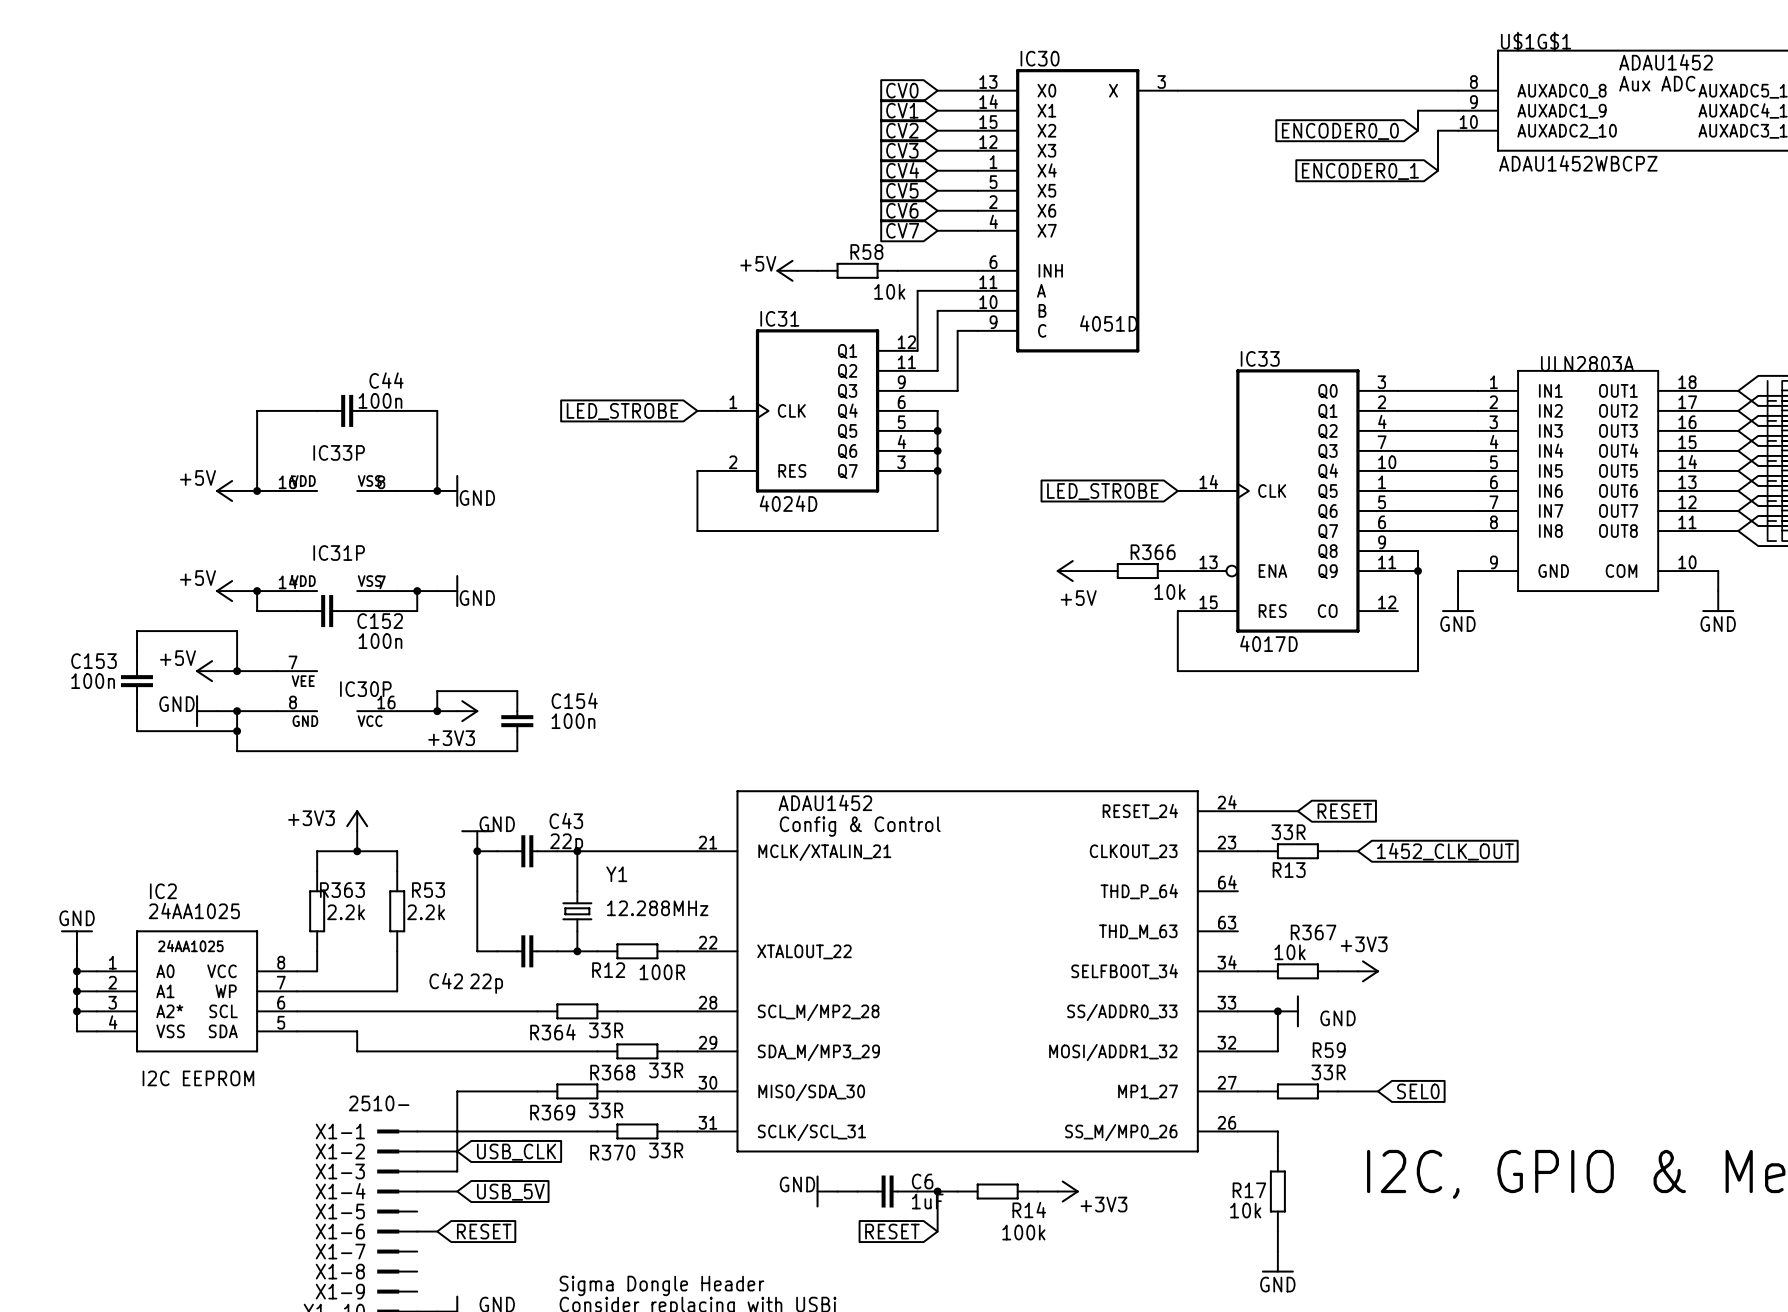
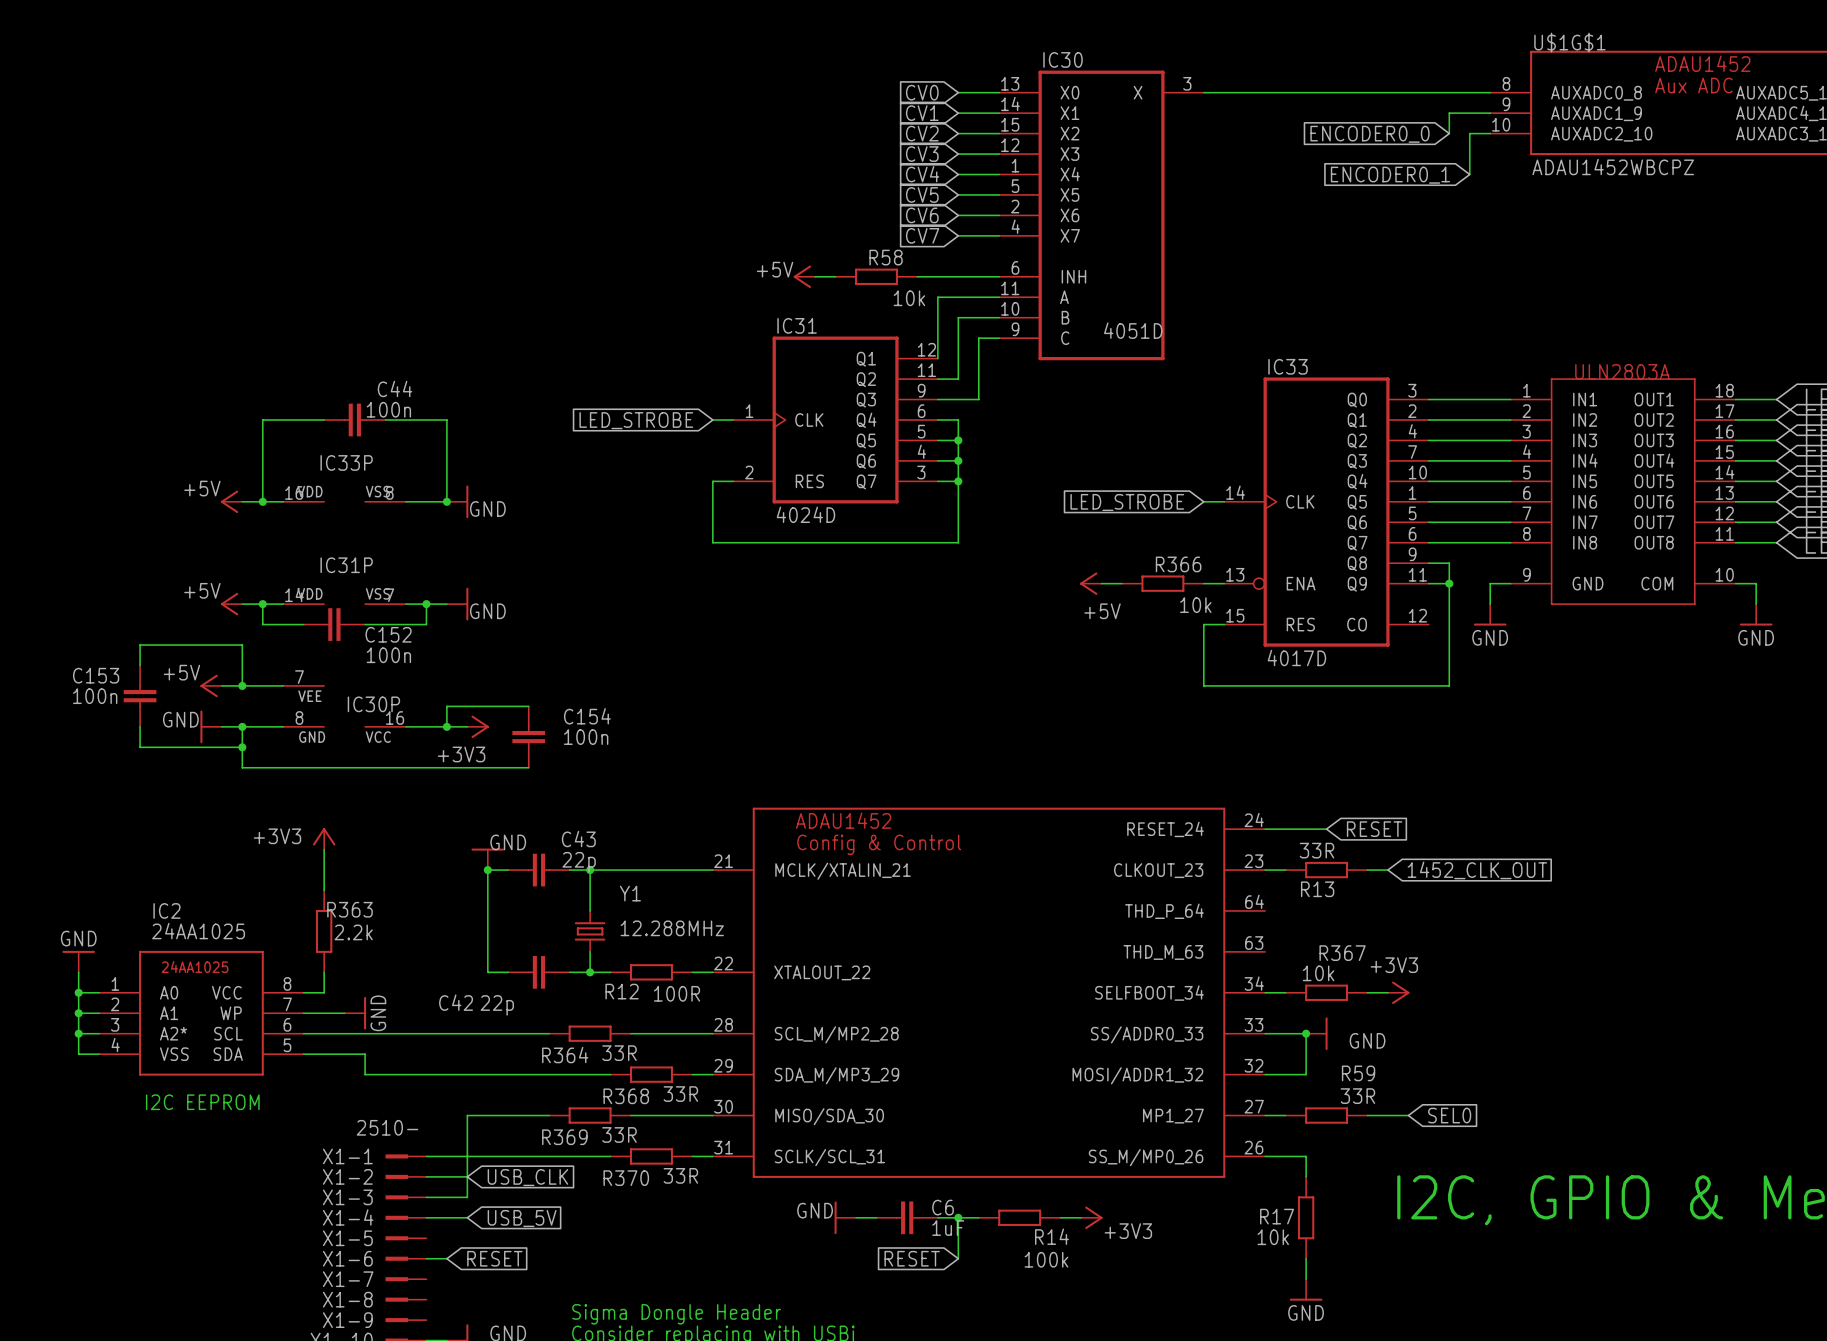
power symbol position: +3V3 (357, 820) -> +3V3 (324, 838)
wire: (357, 831) (357, 851) -> none
wire: (317, 851) (397, 851) (397, 871) -> (324, 870) (324, 849)
junction: (357, 851) -> none
R53: 2.2k (397, 911) -> none
wire: (397, 951) (397, 991) (337, 991) -> none
power symbol: none -> GND (355, 1013)

